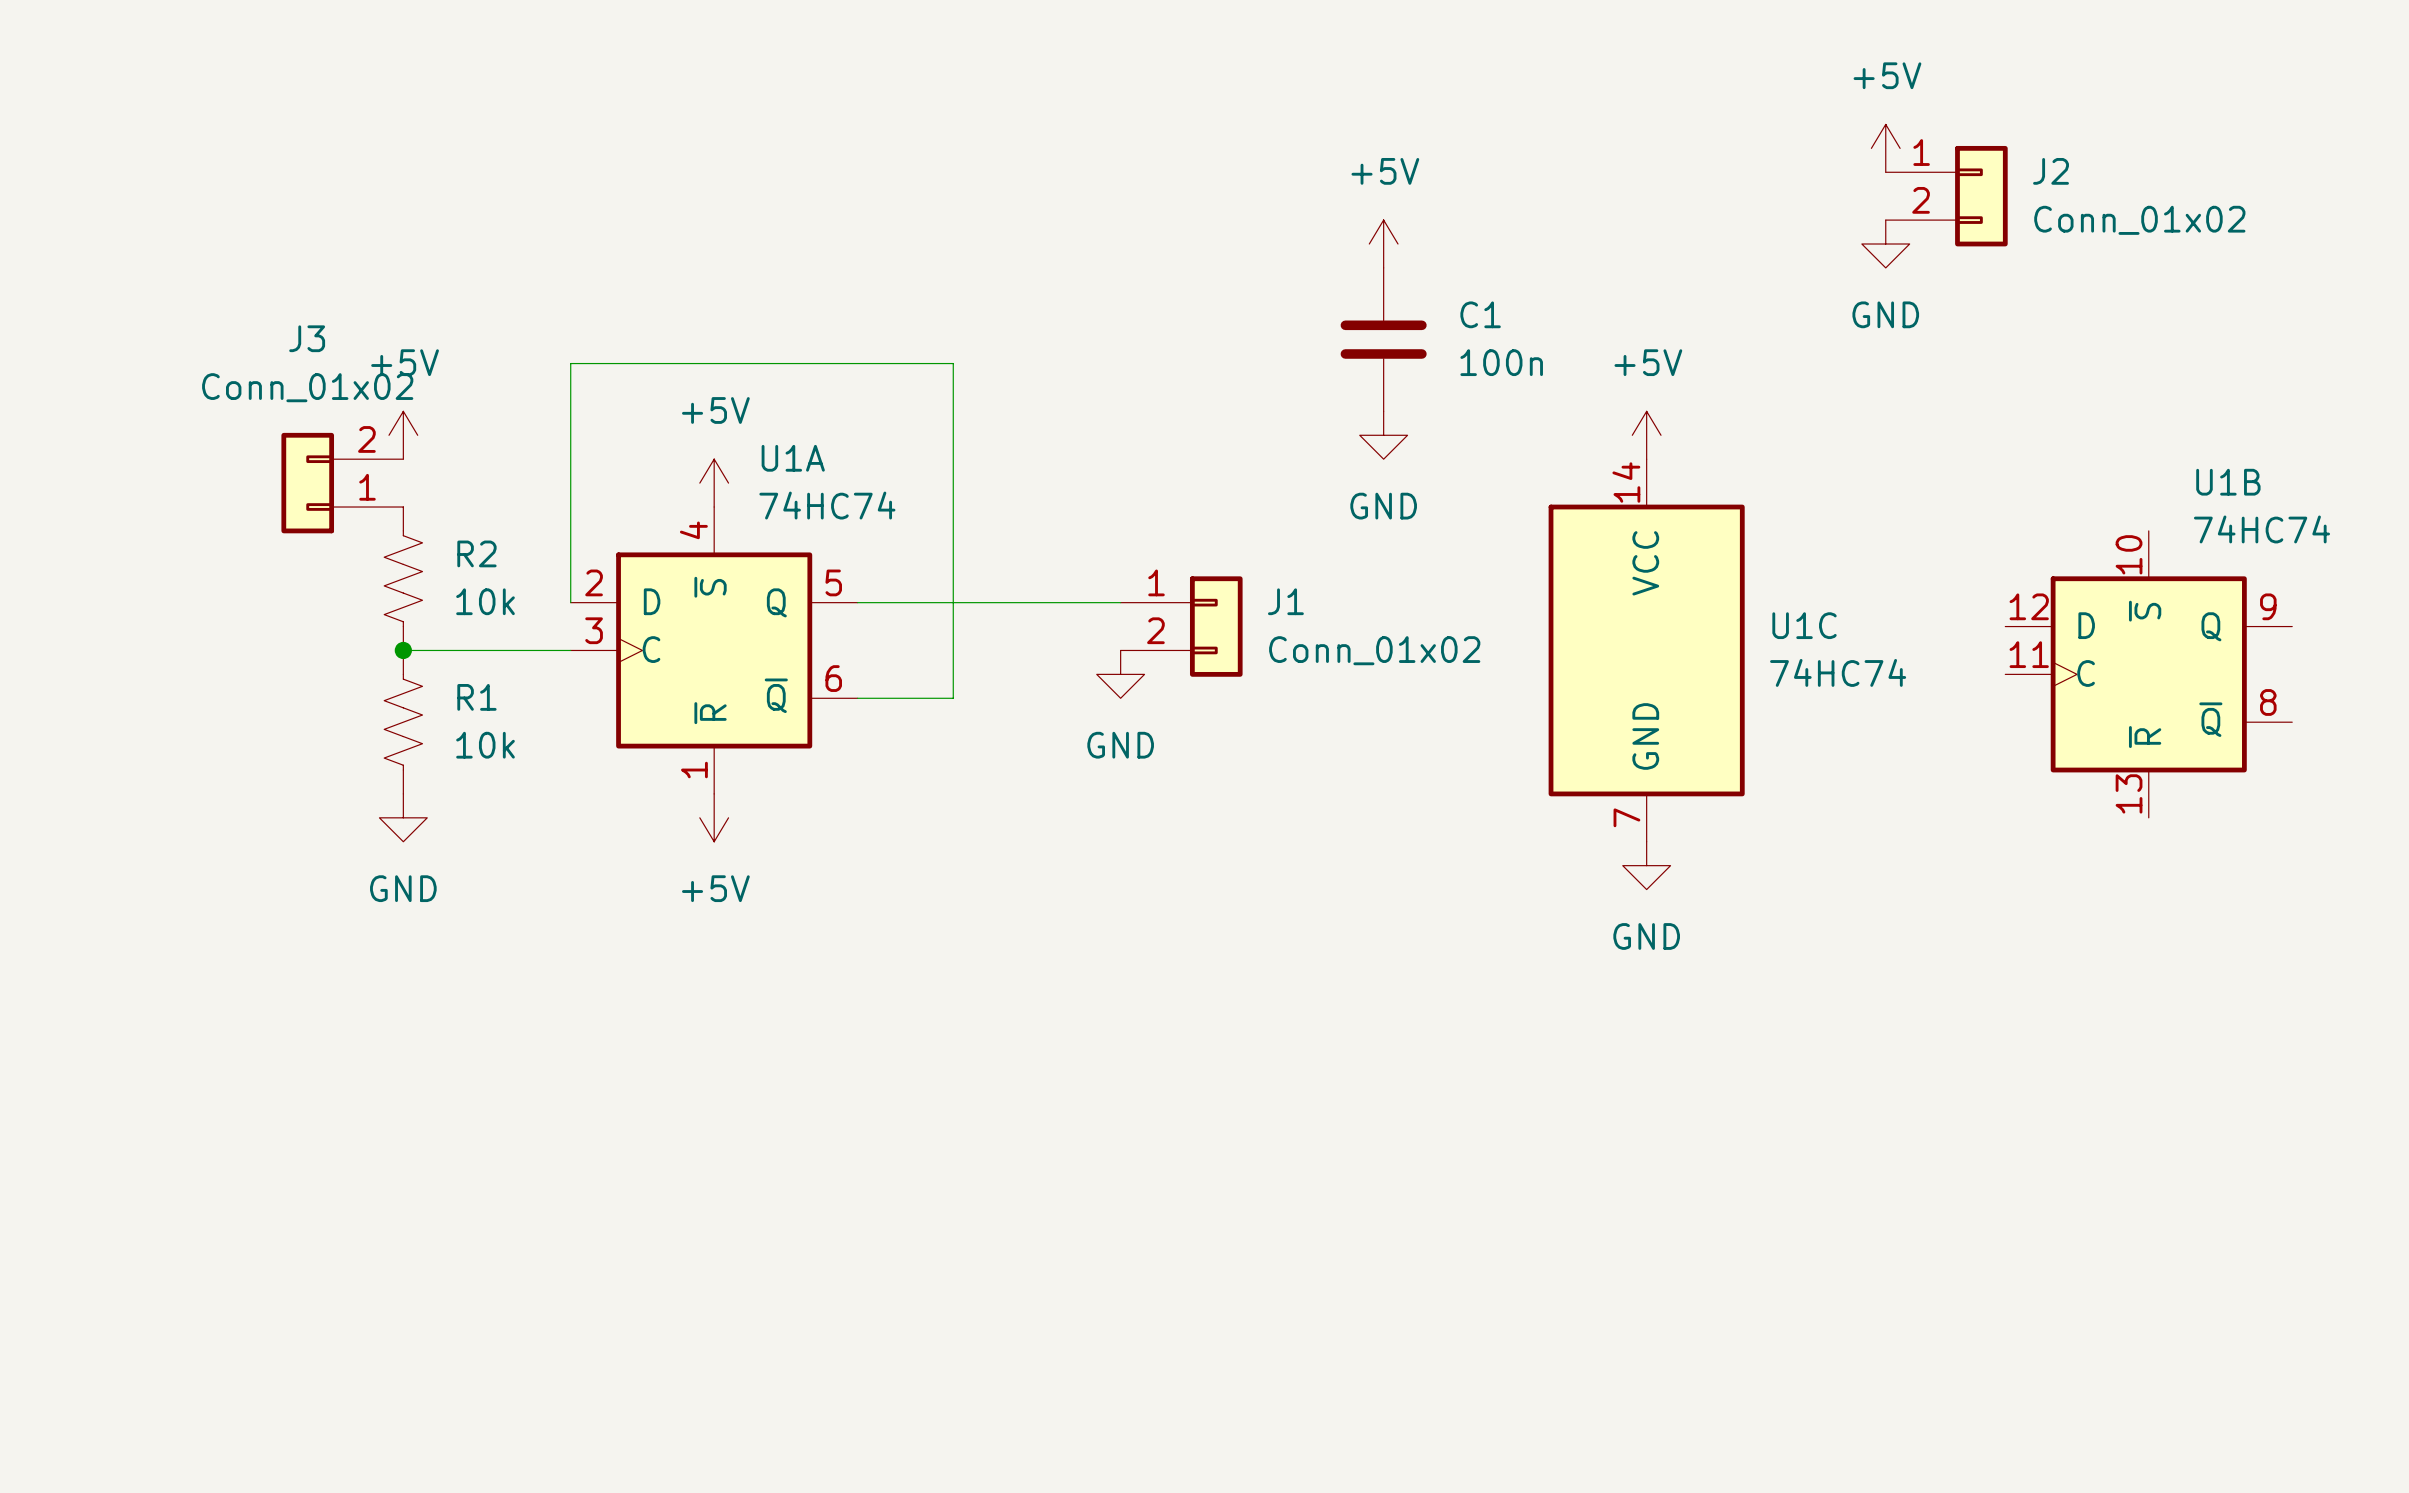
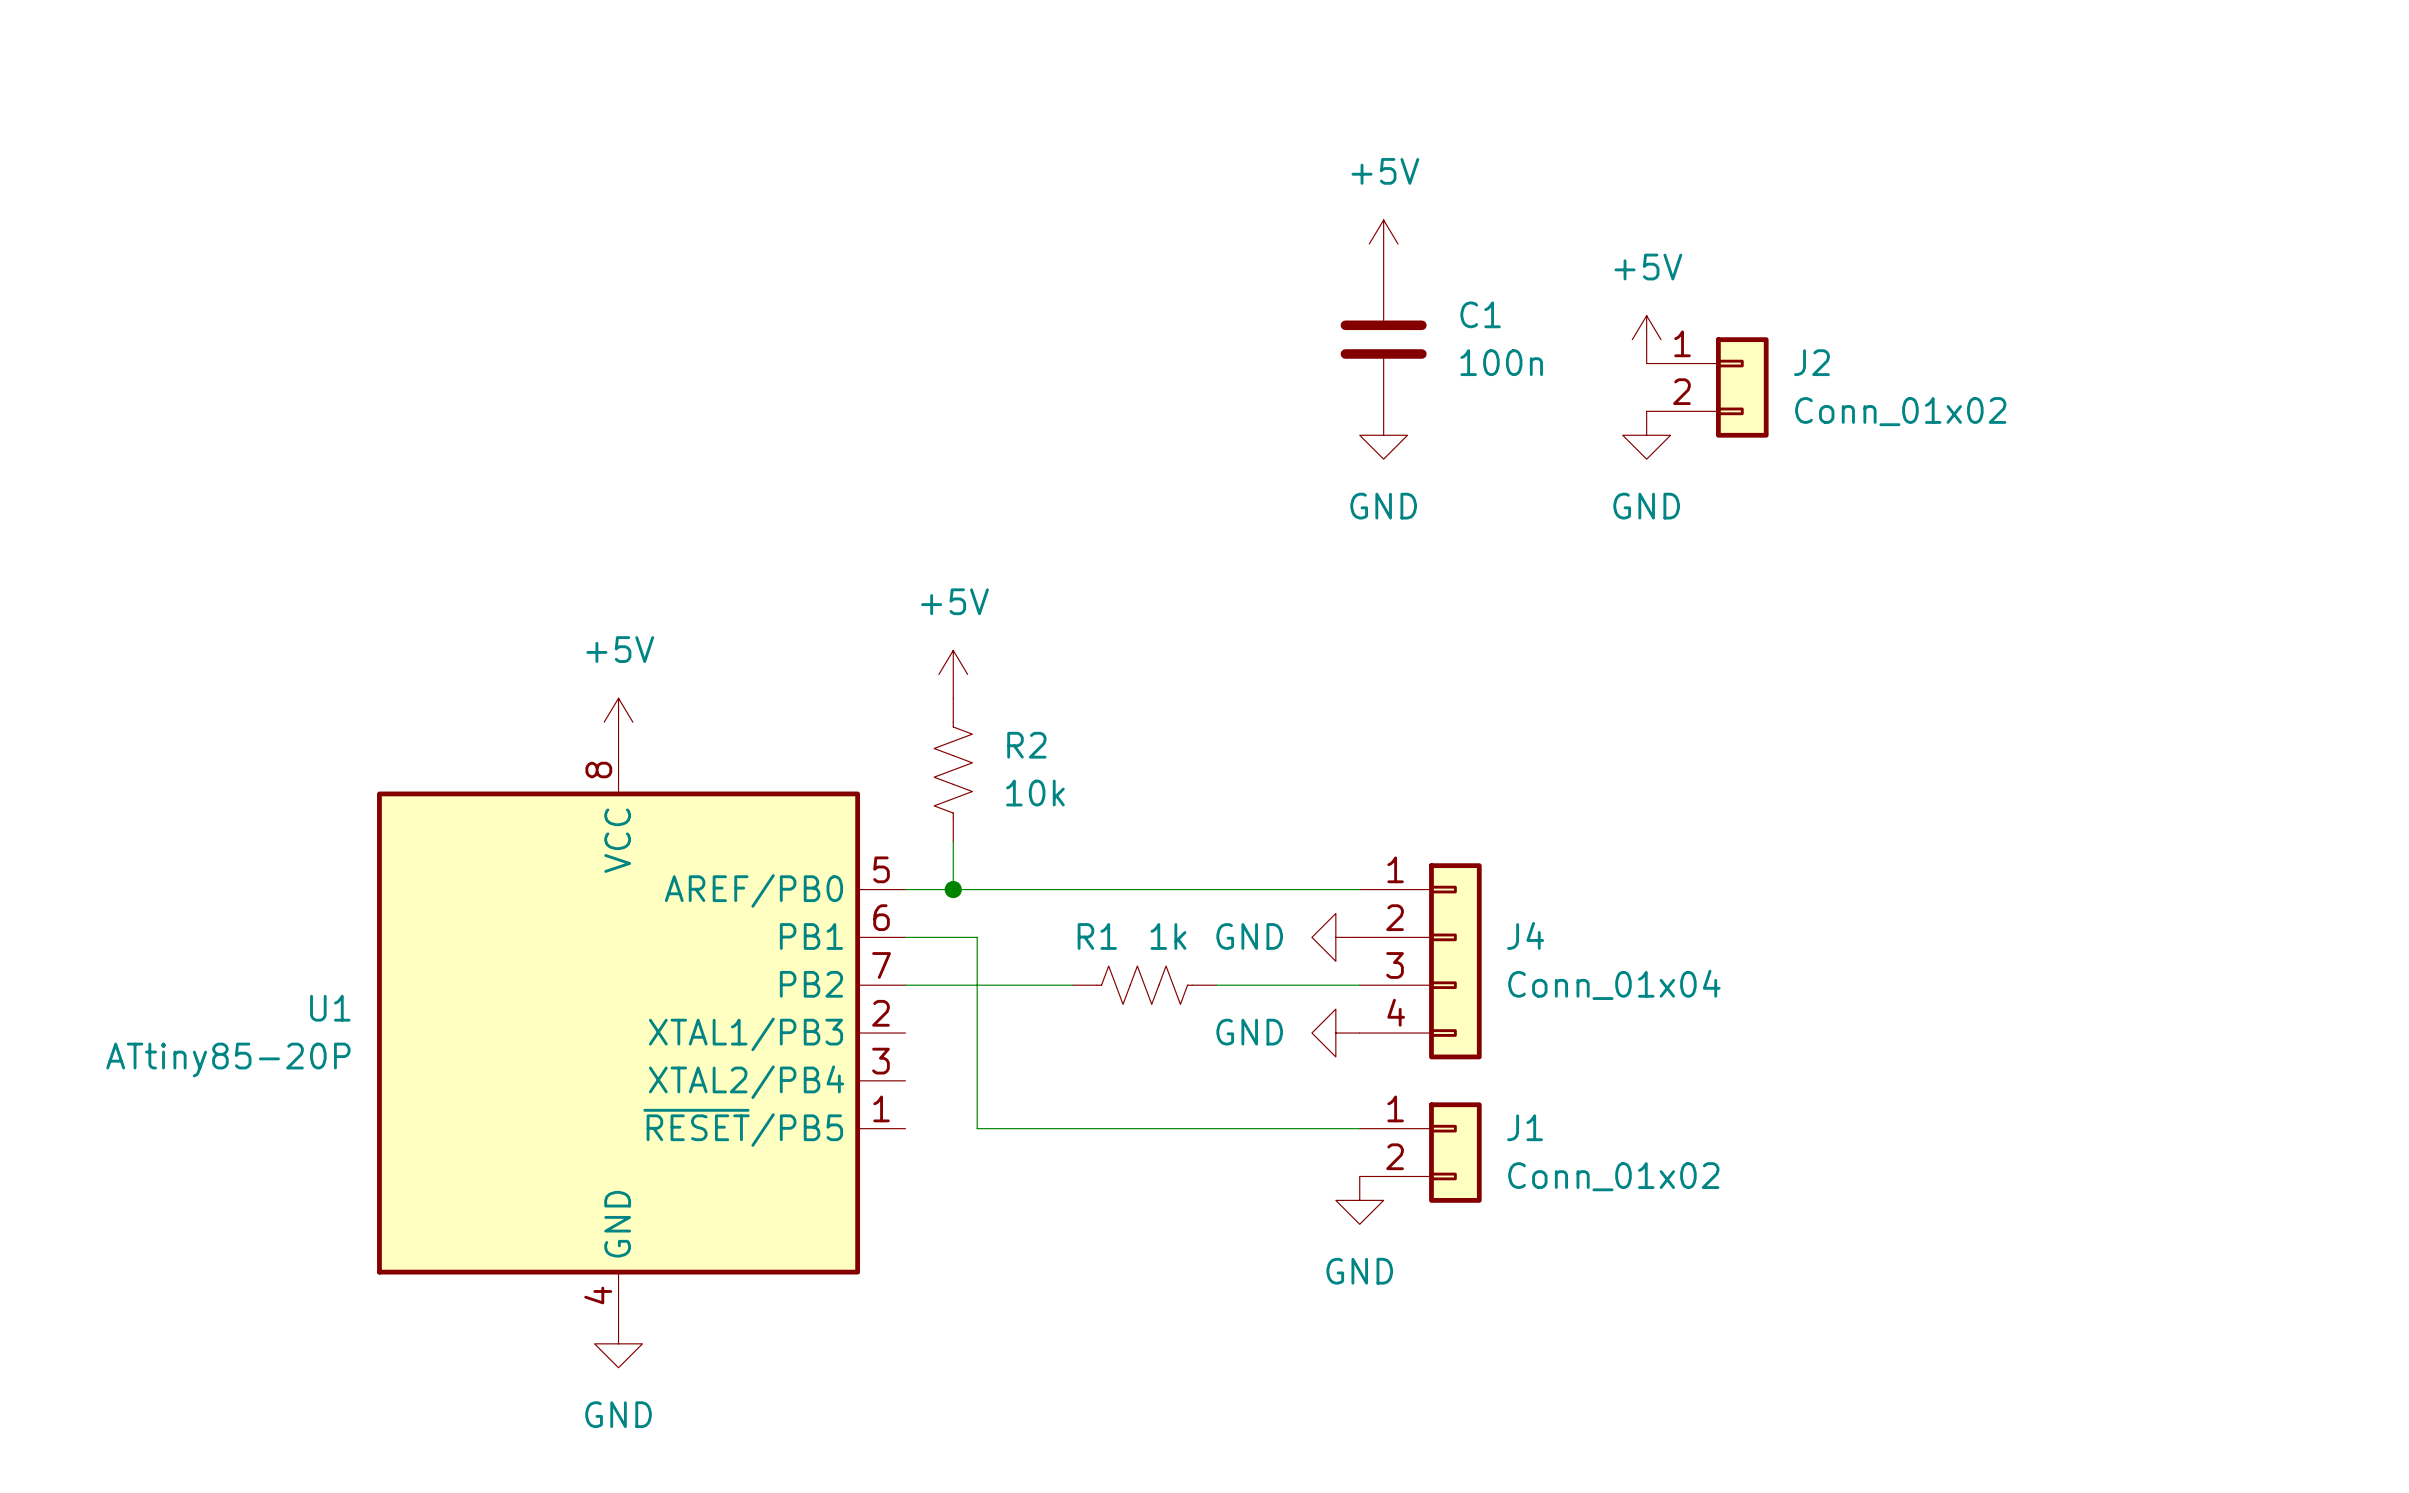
power symbol position: +5V (1885, 148) -> +5V (1646, 339)
J2 position: (1946, 196) -> (1707, 387)
power symbol: GND (1885, 244) -> none
power symbol: +5V (403, 435) -> none
power symbol: +5V (1646, 435) -> GND (1646, 435)
J3: Conn_01x02 (342, 483) -> none
power symbol: +5V (714, 483) -> none
R2 position: (403, 578) -> (953, 770)
wire: (570, 602) (570, 363) (953, 363) (953, 698) (857, 698) -> none
wire: (857, 602) (1120, 602) -> none
J1 position: (1181, 626) -> (1420, 1152)
wire: (403, 650) (570, 650) -> none
junction: (403, 650) -> none
U1A: 74HC74 (714, 650) -> none
U1C: 74HC74 (1646, 650) -> none
power symbol: none -> +5V (953, 674)
power symbol: GND (1120, 674) -> none
U1B: 74HC74 (2148, 674) -> none
R1 name position: R1 (476, 697) -> R1 (1097, 936)
R1 rotation: 0° (403, 722) -> 90° clockwise (1144, 985)
R1 position: (403, 722) -> (1144, 985)
power symbol: none -> +5V (618, 722)
R1 value: 10k (485, 745) -> 1k (1168, 936)
power symbol: GND (403, 817) -> none
power symbol: +5V (714, 817) -> none
wire: none -> (953, 841) (953, 889)
power symbol: GND (1646, 865) -> none
wire: none -> (905, 889) (1359, 889)
junction: none -> (953, 889)
wire: none -> (905, 937) (977, 937) (977, 1128) (1359, 1128)
power symbol: none -> GND (1335, 937)
J4: none -> Conn_01x04 (1420, 961)
wire: none -> (905, 985) (1072, 985)
wire: none -> (1216, 985) (1359, 985)
U1: none -> ATtiny85-20P (641, 1033)
power symbol: none -> GND (1335, 1033)
power symbol: none -> GND (1359, 1200)
power symbol: none -> GND (618, 1343)

